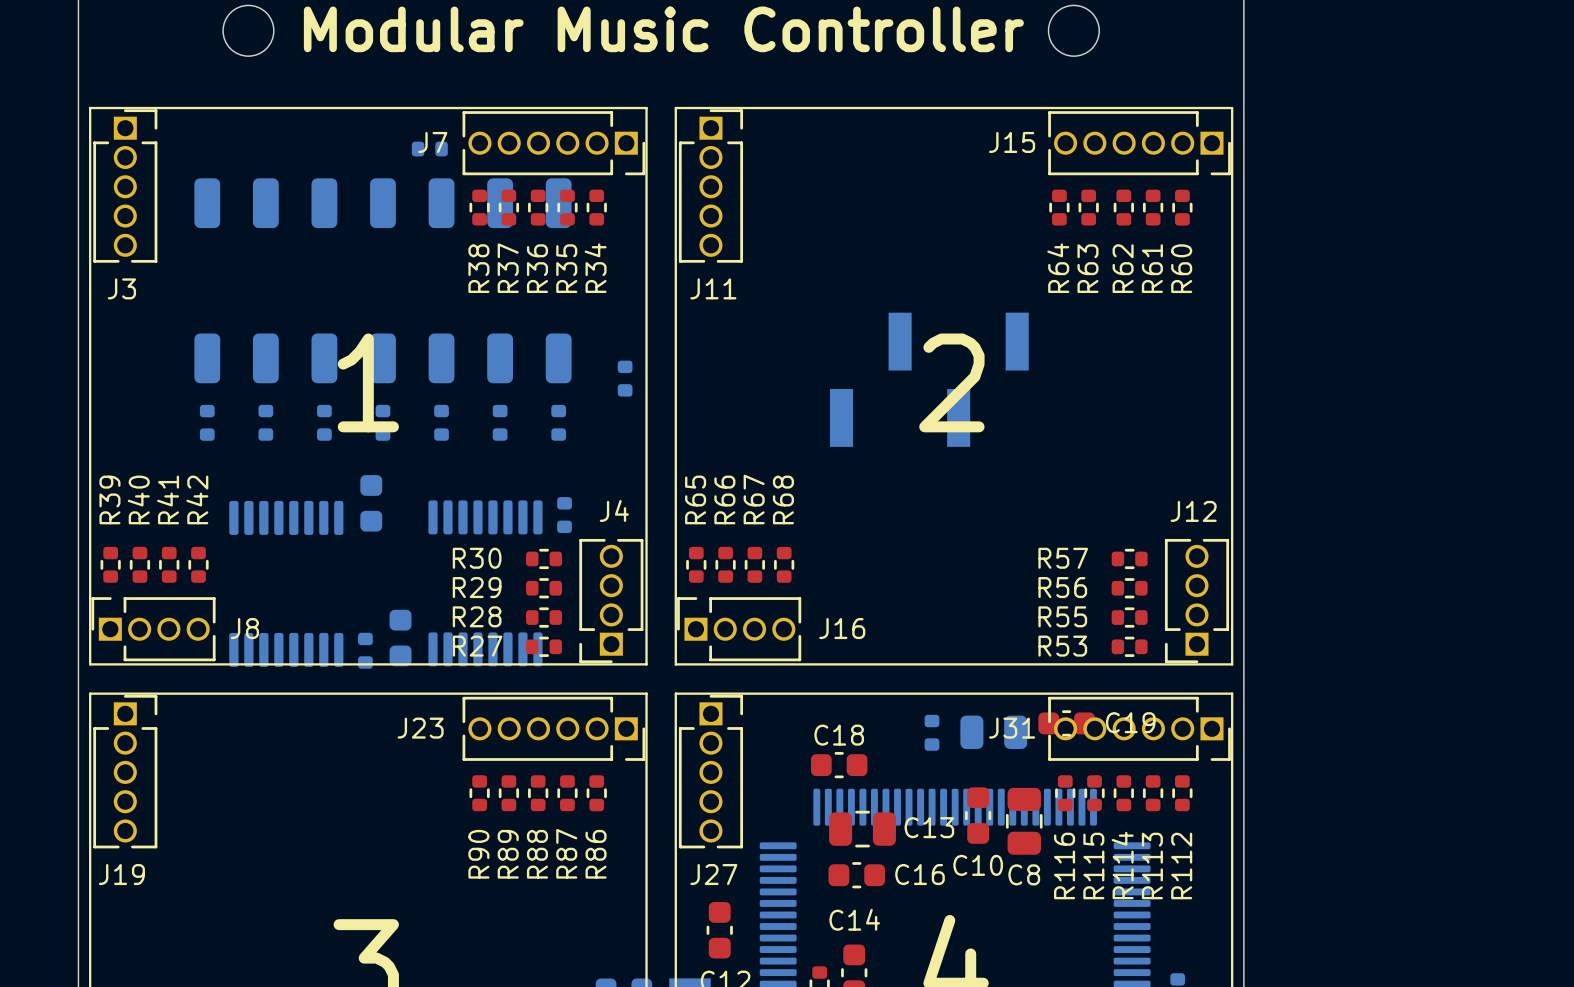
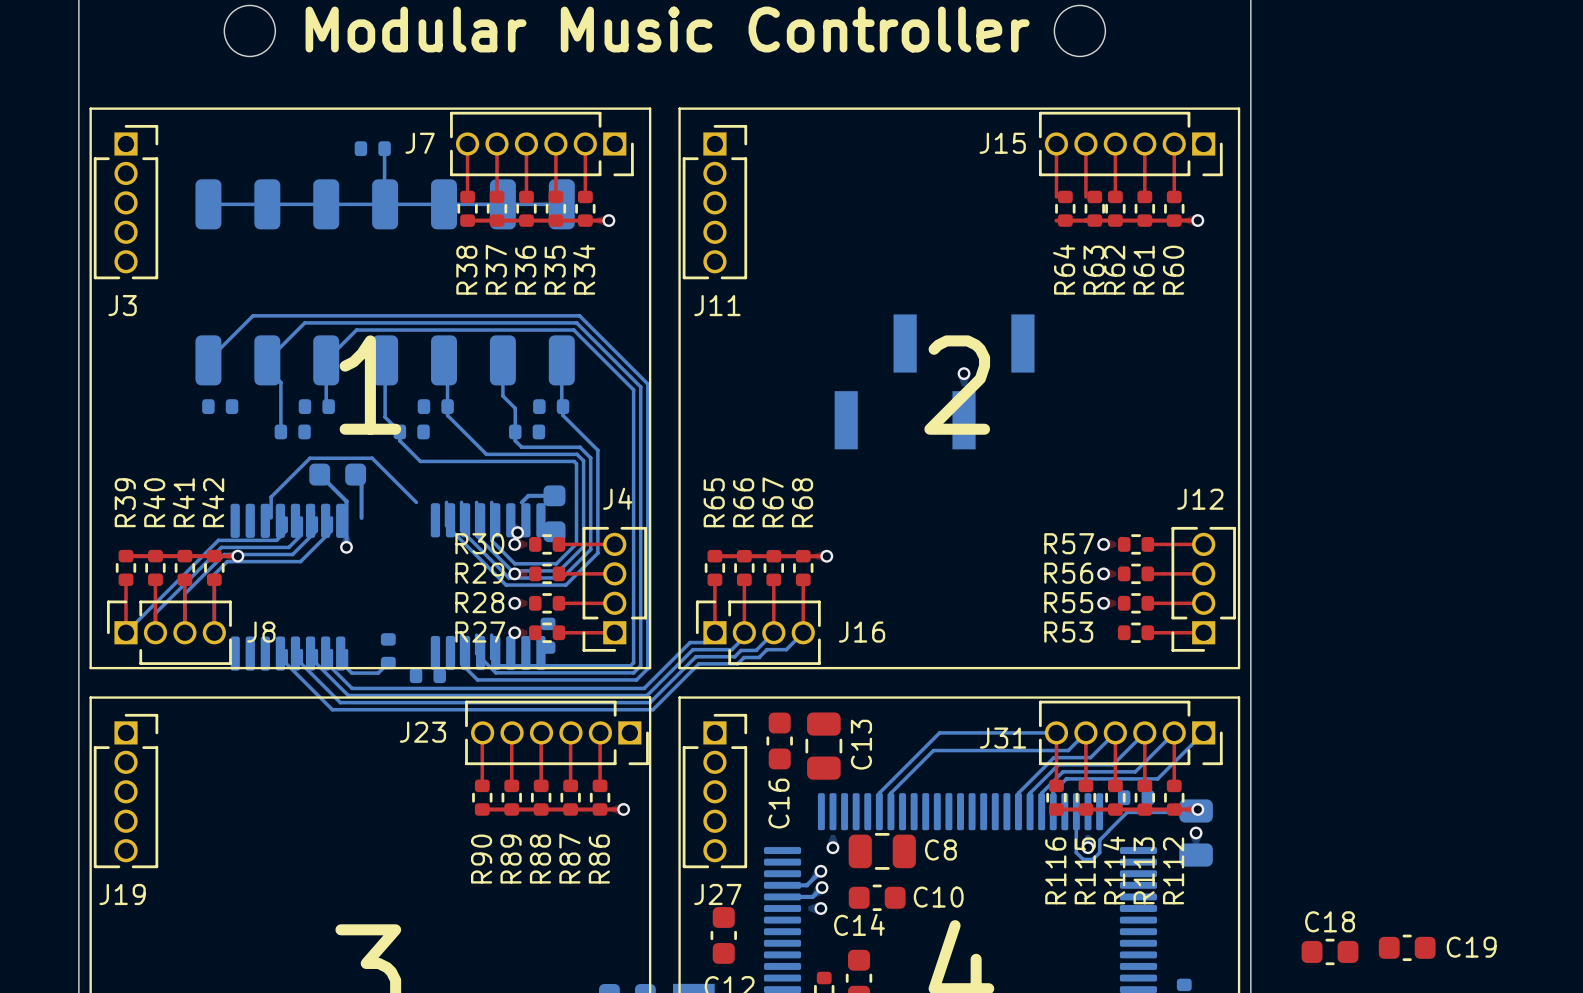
top track: none -> (467, 144) (467, 196)
top track: none -> (497, 144) (497, 196)
top track: none -> (526, 144) (526, 196)
top track: none -> (555, 144) (555, 196)
J7 position: (553, 143) -> (541, 143)
top track: none -> (585, 144) (585, 196)
top track: none -> (1056, 144) (1056, 196)
top track: none -> (1085, 144) (1085, 196)
top track: none -> (1115, 144) (1115, 196)
top track: none -> (1144, 144) (1144, 196)
J15 position: (1139, 143) -> (1130, 143)
top track: none -> (1174, 144) (1174, 196)
bottom track: none -> (384, 148) (385, 204)
part position: (429, 149) -> (372, 148)
J3 position: (125, 186) -> (126, 202)
J11 position: (710, 186) -> (714, 202)
bottom track: none -> (208, 204) (561, 204)
R38 position: (479, 207) -> (467, 208)
R37 position: (508, 207) -> (497, 208)
R36 position: (538, 207) -> (526, 208)
R35 position: (567, 207) -> (555, 208)
R34 position: (596, 207) -> (585, 208)
R62 position: (1123, 207) -> (1115, 208)
R61 position: (1153, 207) -> (1144, 208)
R60 position: (1182, 207) -> (1174, 208)
via: none -> (608, 220)
via: none -> (1197, 220)
bottom track: none -> (208, 360) (252, 315) (579, 315) (647, 384) (647, 668) (636, 679) (477, 679) (461, 663) (461, 635)
bottom track: none -> (385, 360) (385, 417) (399, 431) (399, 440) (420, 461) (574, 461) (576, 463) (576, 543) (556, 563) (514, 563) (491, 540) (491, 502)
bottom track: none -> (444, 360) (447, 363) (447, 415) (486, 454) (577, 454) (583, 460) (583, 546) (559, 570) (511, 570) (476, 535) (476, 502)
bottom track: none -> (502, 360) (502, 396) (515, 408) (515, 440) (521, 447) (579, 447) (590, 457) (590, 549) (562, 577) (509, 577) (461, 530) (461, 502)
bottom track: none -> (562, 361) (563, 415) (597, 450) (597, 553) (565, 585) (506, 585) (446, 525) (446, 502)
via: none -> (964, 373)
part: (625, 378) -> none
part: none -> (316, 406)
bottom track: none -> (328, 406) (326, 404) (326, 360) (356, 330) (573, 330) (633, 389) (633, 662) (630, 665) (499, 665) (491, 658) (491, 635)
part: none -> (435, 406)
part: none -> (551, 406)
part rotation: 0° (207, 422) -> 90° clockwise (220, 406)
part position: (207, 422) -> (220, 406)
part: (265, 422) -> none
part: (324, 422) -> none
part: (382, 422) -> none
part: (441, 422) -> none
part: (500, 422) -> none
part: (558, 422) -> none
bottom track: none -> (280, 431) (280, 382) (267, 368) (267, 360) (304, 322) (576, 322) (640, 386) (640, 665) (633, 672) (495, 672) (476, 653) (476, 635)
part: none -> (292, 431)
part: none -> (411, 431)
part: none -> (527, 431)
bottom track: none -> (319, 474) (346, 501) (346, 547)
bottom track: none -> (355, 474) (361, 480) (361, 517)
bottom track: none -> (554, 495) (528, 495) (521, 502)
part footprint: [557, 497, 572, 534] -> [543, 485, 566, 543]
bottom track: none -> (416, 502) (372, 458) (309, 458) (271, 497) (271, 517)
part rotation: 0° (371, 503) -> 90° clockwise (337, 474)
part position: (371, 503) -> (337, 474)
bottom track: none -> (286, 517) (286, 530) (276, 540) (218, 540) (126, 632)
bottom track: none -> (301, 517) (301, 535) (288, 547) (221, 547) (155, 613) (155, 632)
bottom track: none -> (316, 517) (316, 530) (292, 554) (224, 554) (184, 593) (184, 632)
bottom track: none -> (331, 517) (331, 530) (300, 561) (227, 561) (214, 574) (214, 632)
via: none -> (517, 532)
top track: none -> (614, 541) (612, 544) (558, 544)
top track: none -> (1203, 541) (1201, 544) (1147, 544)
via: none -> (514, 544)
via: none -> (1103, 544)
via: none -> (346, 547)
via: none -> (237, 556)
top track: none -> (714, 556) (803, 556)
top track: none -> (803, 556) (826, 556)
via: none -> (826, 556)
R30 position: (544, 558) -> (547, 544)
R57 position: (1129, 558) -> (1136, 544)
R39 position: (110, 564) -> (126, 567)
R40 position: (139, 564) -> (155, 567)
R41 position: (169, 564) -> (184, 567)
R42 position: (198, 564) -> (214, 567)
R65 position: (696, 564) -> (714, 568)
R66 position: (725, 564) -> (744, 568)
R67 position: (754, 564) -> (773, 568)
R68 position: (784, 564) -> (803, 568)
top track: none -> (614, 571) (612, 573) (558, 573)
top track: none -> (1203, 571) (1201, 573) (1147, 573)
via: none -> (514, 573)
via: none -> (1103, 573)
top track: none -> (126, 579) (126, 632)
top track: none -> (155, 579) (155, 632)
top track: none -> (184, 579) (184, 632)
top track: none -> (214, 579) (214, 632)
top track: none -> (714, 579) (714, 632)
top track: none -> (744, 579) (744, 632)
top track: none -> (773, 579) (773, 632)
top track: none -> (803, 579) (803, 632)
R29 position: (544, 588) -> (547, 573)
R56 position: (1129, 588) -> (1135, 573)
top track: none -> (614, 600) (612, 603) (558, 603)
top track: none -> (1203, 600) (1201, 603) (1147, 603)
via: none -> (514, 603)
via: none -> (1103, 603)
J4 position: (611, 601) -> (614, 589)
J12 position: (1196, 601) -> (1203, 589)
R28 position: (544, 617) -> (547, 603)
R55 position: (1129, 617) -> (1135, 603)
top track: none -> (614, 630) (612, 632) (558, 632)
top track: none -> (1203, 630) (1201, 632) (1147, 632)
J8 position: (153, 629) -> (169, 632)
via: none -> (514, 632)
bottom track: none -> (714, 632) (705, 642) (690, 642) (644, 688) (352, 688) (331, 667) (331, 650)
J16 position: (739, 629) -> (758, 632)
bottom track: none -> (744, 632) (744, 637) (731, 649) (692, 649) (647, 695) (348, 695) (316, 663) (316, 650)
bottom track: none -> (773, 632) (756, 650) (741, 650) (734, 656) (695, 656) (650, 702) (340, 702) (301, 663) (301, 650)
bottom track: none -> (803, 632) (786, 649) (766, 649) (759, 657) (744, 657) (737, 663) (698, 663) (652, 709) (332, 709) (286, 663) (286, 650)
part: none -> (548, 635)
part: (400, 638) -> none
R27 position: (544, 646) -> (547, 632)
R53 position: (1129, 646) -> (1135, 632)
bottom track: none -> (346, 650) (346, 667) (351, 673) (378, 673) (388, 663)
part position: (365, 650) -> (388, 651)
part: none -> (427, 675)
C19 position: (1066, 723) -> (1407, 947)
J31 name position: J31 (1012, 728) -> J31 (1003, 738)
bottom track: none -> (1056, 732) (939, 732) (879, 793) (879, 811)
bottom track: none -> (1085, 732) (1068, 750) (933, 750) (890, 793) (890, 811)
bottom track: none -> (1115, 732) (1090, 757) (1053, 757) (1018, 793) (1018, 811)
bottom track: none -> (1144, 732) (1112, 764) (1058, 764) (1030, 793) (1030, 811)
J31 position: (1139, 728) -> (1130, 732)
bottom track: none -> (1174, 732) (1135, 771) (1062, 771) (1041, 793) (1041, 811)
bottom track: none -> (1203, 732) (1157, 778) (1066, 778) (1053, 792) (1053, 811)
top track: none -> (482, 733) (482, 785)
top track: none -> (511, 733) (511, 785)
top track: none -> (541, 733) (541, 785)
top track: none -> (570, 733) (570, 785)
top track: none -> (600, 733) (600, 785)
top track: none -> (1056, 733) (1056, 785)
top track: none -> (1085, 733) (1085, 785)
top track: none -> (1115, 733) (1115, 785)
top track: none -> (1144, 733) (1144, 785)
top track: none -> (1174, 733) (1174, 785)
part: (931, 732) -> none
part rotation: 0° (993, 732) -> 90° clockwise (1196, 833)
part position: (993, 732) -> (1196, 833)
C18 position: (839, 765) -> (1330, 951)
J19 position: (125, 771) -> (126, 791)
J27 position: (710, 771) -> (714, 791)
R116 position: (1065, 793) -> (1056, 797)
R115 position: (1094, 793) -> (1085, 797)
R114 position: (1123, 793) -> (1115, 797)
part: none -> (1135, 797)
R113 position: (1153, 793) -> (1144, 797)
R112 position: (1182, 793) -> (1174, 797)
via: none -> (623, 809)
via: none -> (1197, 809)
bottom track: none -> (1196, 810) (1127, 812) (1108, 831)
bottom track: none -> (1076, 811) (1076, 852) (1083, 859) (1092, 859) (1099, 852) (1099, 840) (1108, 831)
C10 rotation: 0° (978, 815) -> 90° clockwise (877, 897)
C10 position: (978, 815) -> (877, 897)
C8 rotation: 0° (1024, 821) -> 90° clockwise (882, 851)
C8 position: (1024, 821) -> (882, 851)
via: none -> (1196, 833)
C13 rotation: 0° (862, 829) -> 90° clockwise (823, 746)
C13 position: (862, 829) -> (823, 746)
via: none -> (832, 847)
via: none -> (1088, 847)
C10 name position: C10 (978, 865) -> C10 (938, 897)
bottom track: none -> (820, 871) (806, 885) (782, 885)
via: none -> (820, 871)
C8 name position: C8 (1024, 874) -> C8 (940, 849)
C16 rotation: 0° (856, 875) -> 90° clockwise (779, 740)
C16 position: (856, 875) -> (779, 740)
bottom track: none -> (822, 887) (812, 896) (782, 896)
via: none -> (822, 887)
via: none -> (820, 908)

